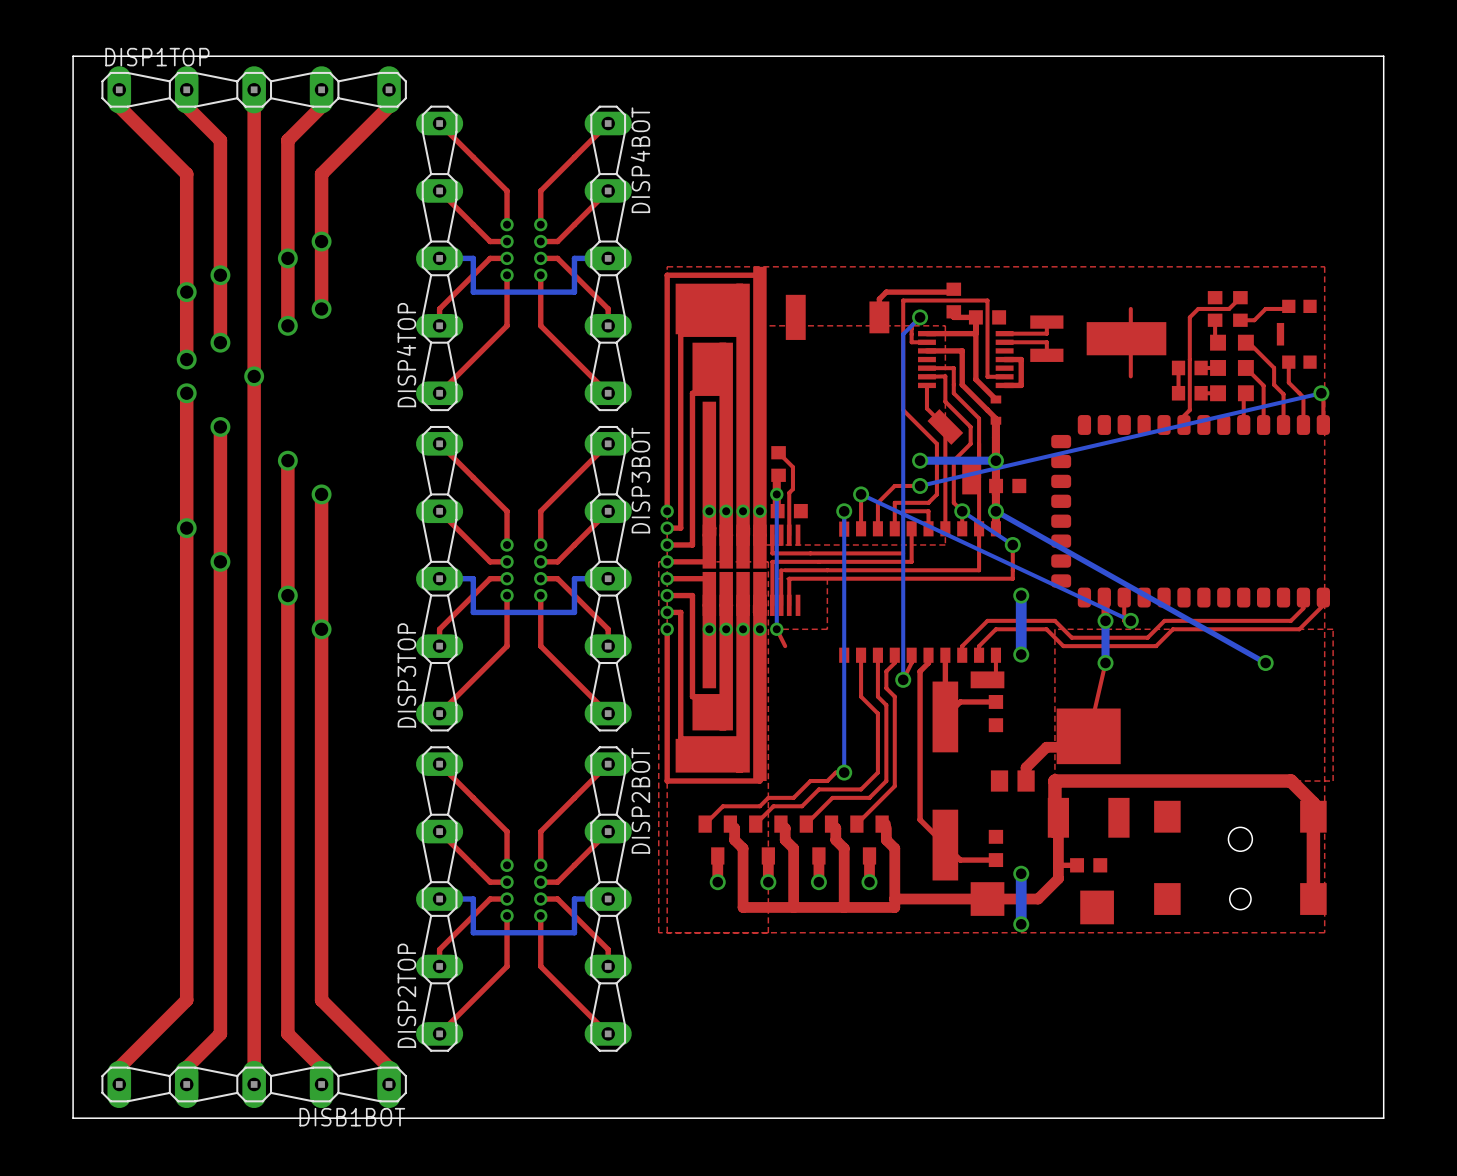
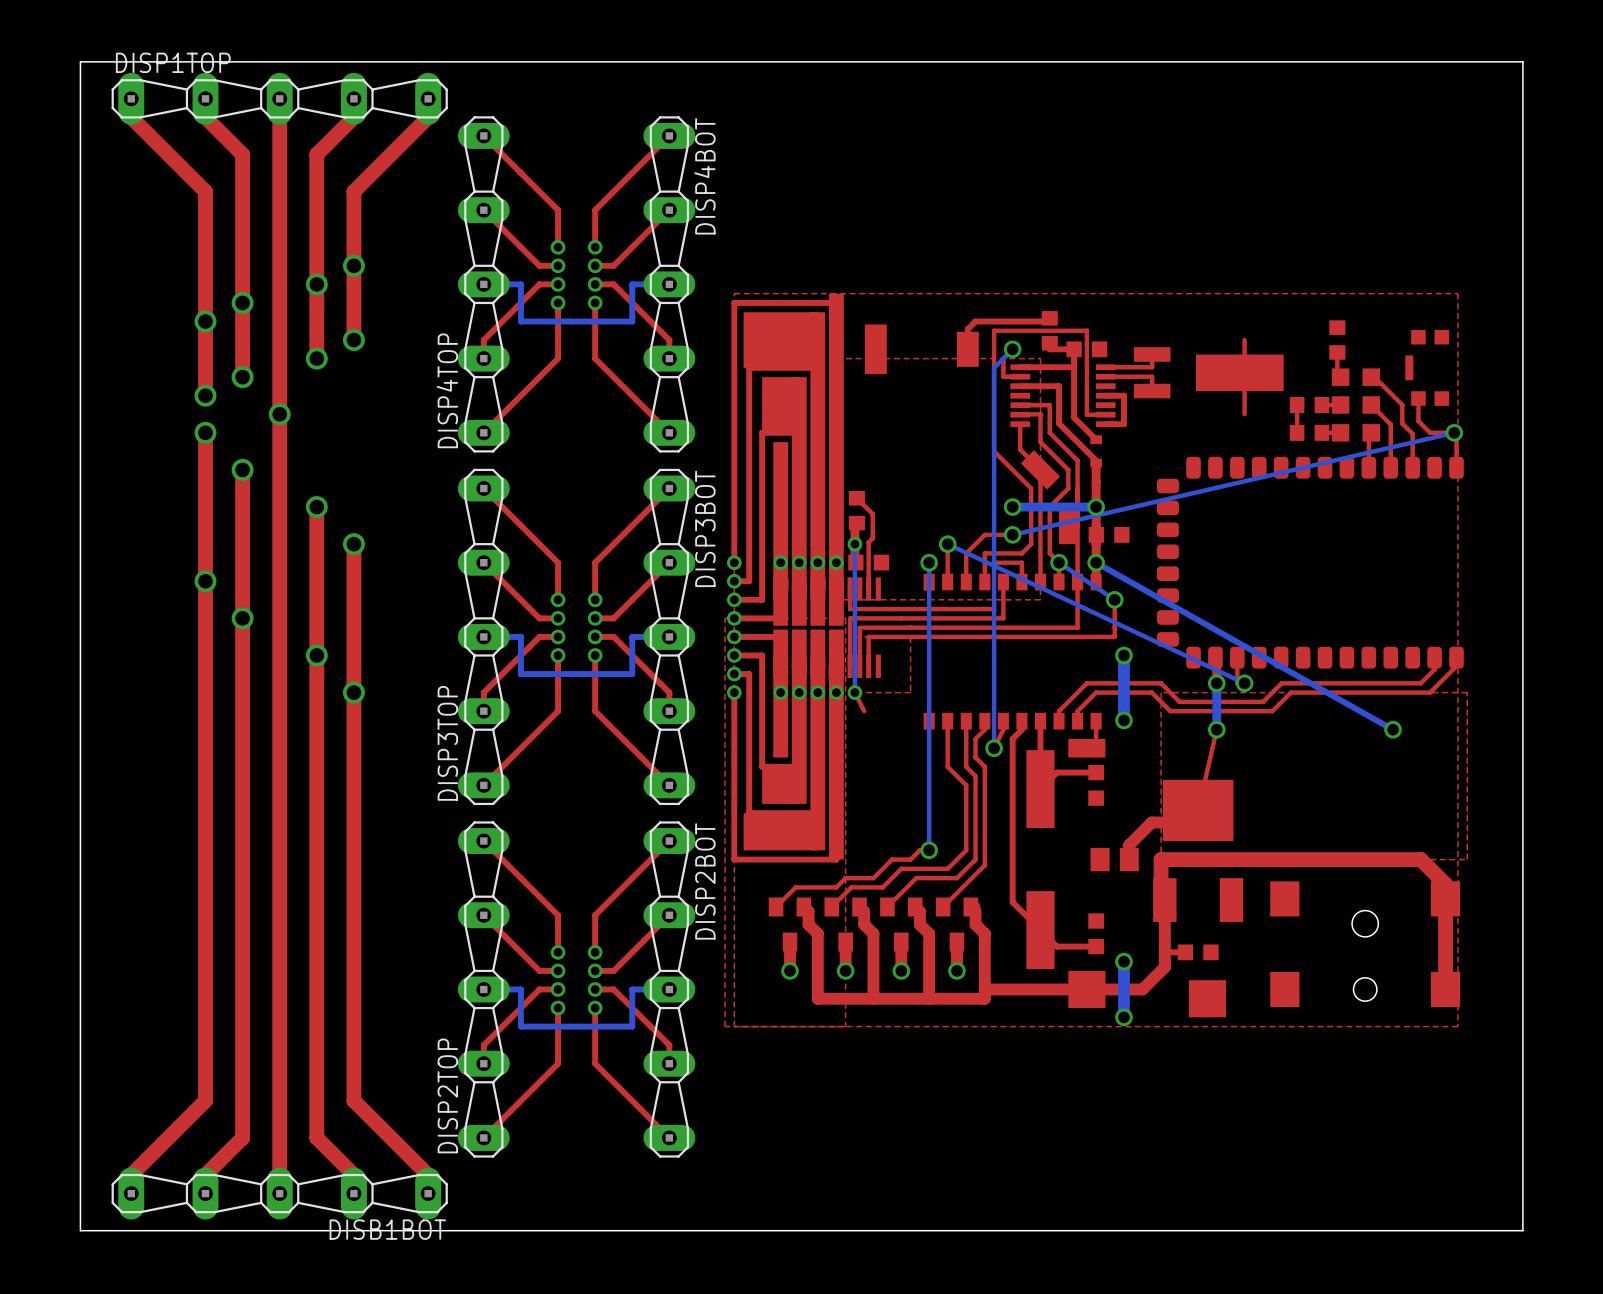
top track: (1240, 297) (1229, 308) (1198, 308) (1189, 317) (1189, 410) (1181, 418) (1183, 424) -> none
top track: (1288, 306) (1286, 308) (1265, 308) (1254, 320) (1240, 320) -> none
part: (1240, 308) -> none
top track: (1299, 393) (1303, 397) (1303, 424) -> (1430, 432) (1454, 432)

